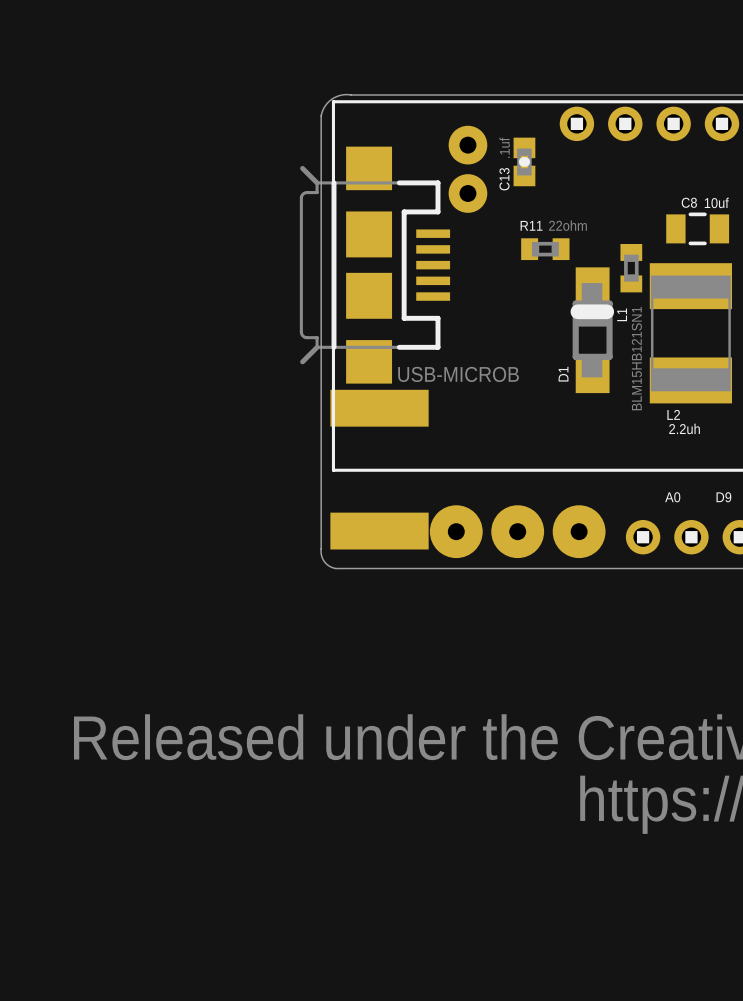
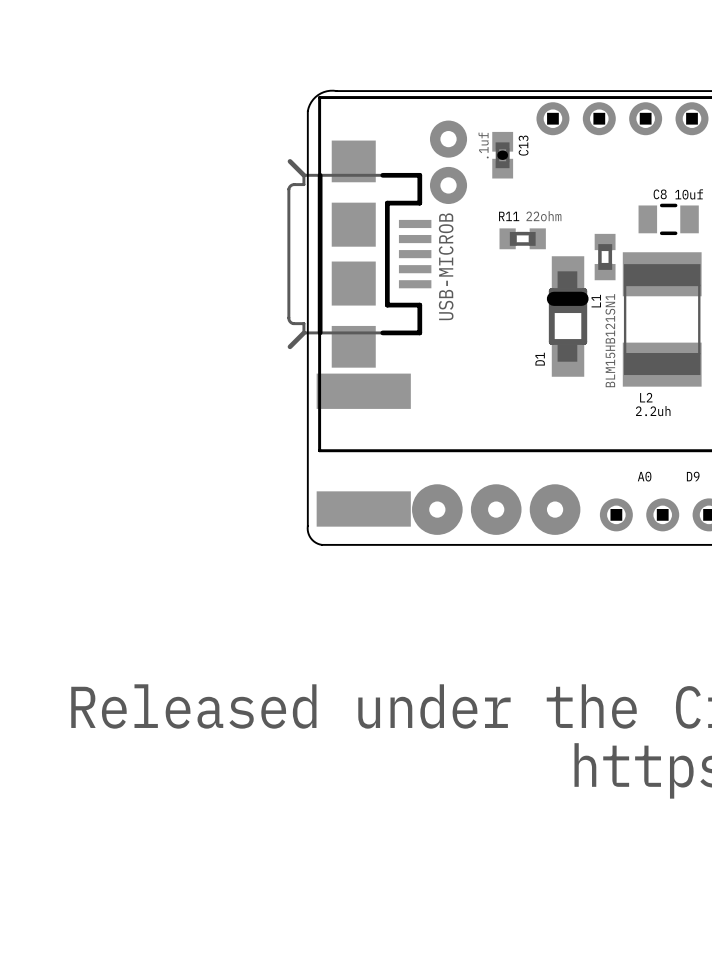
C13 name position: C13 (504, 179) -> C13 (523, 145)
part value rotation: 0° (458, 374) -> 90° counterclockwise (446, 266)

